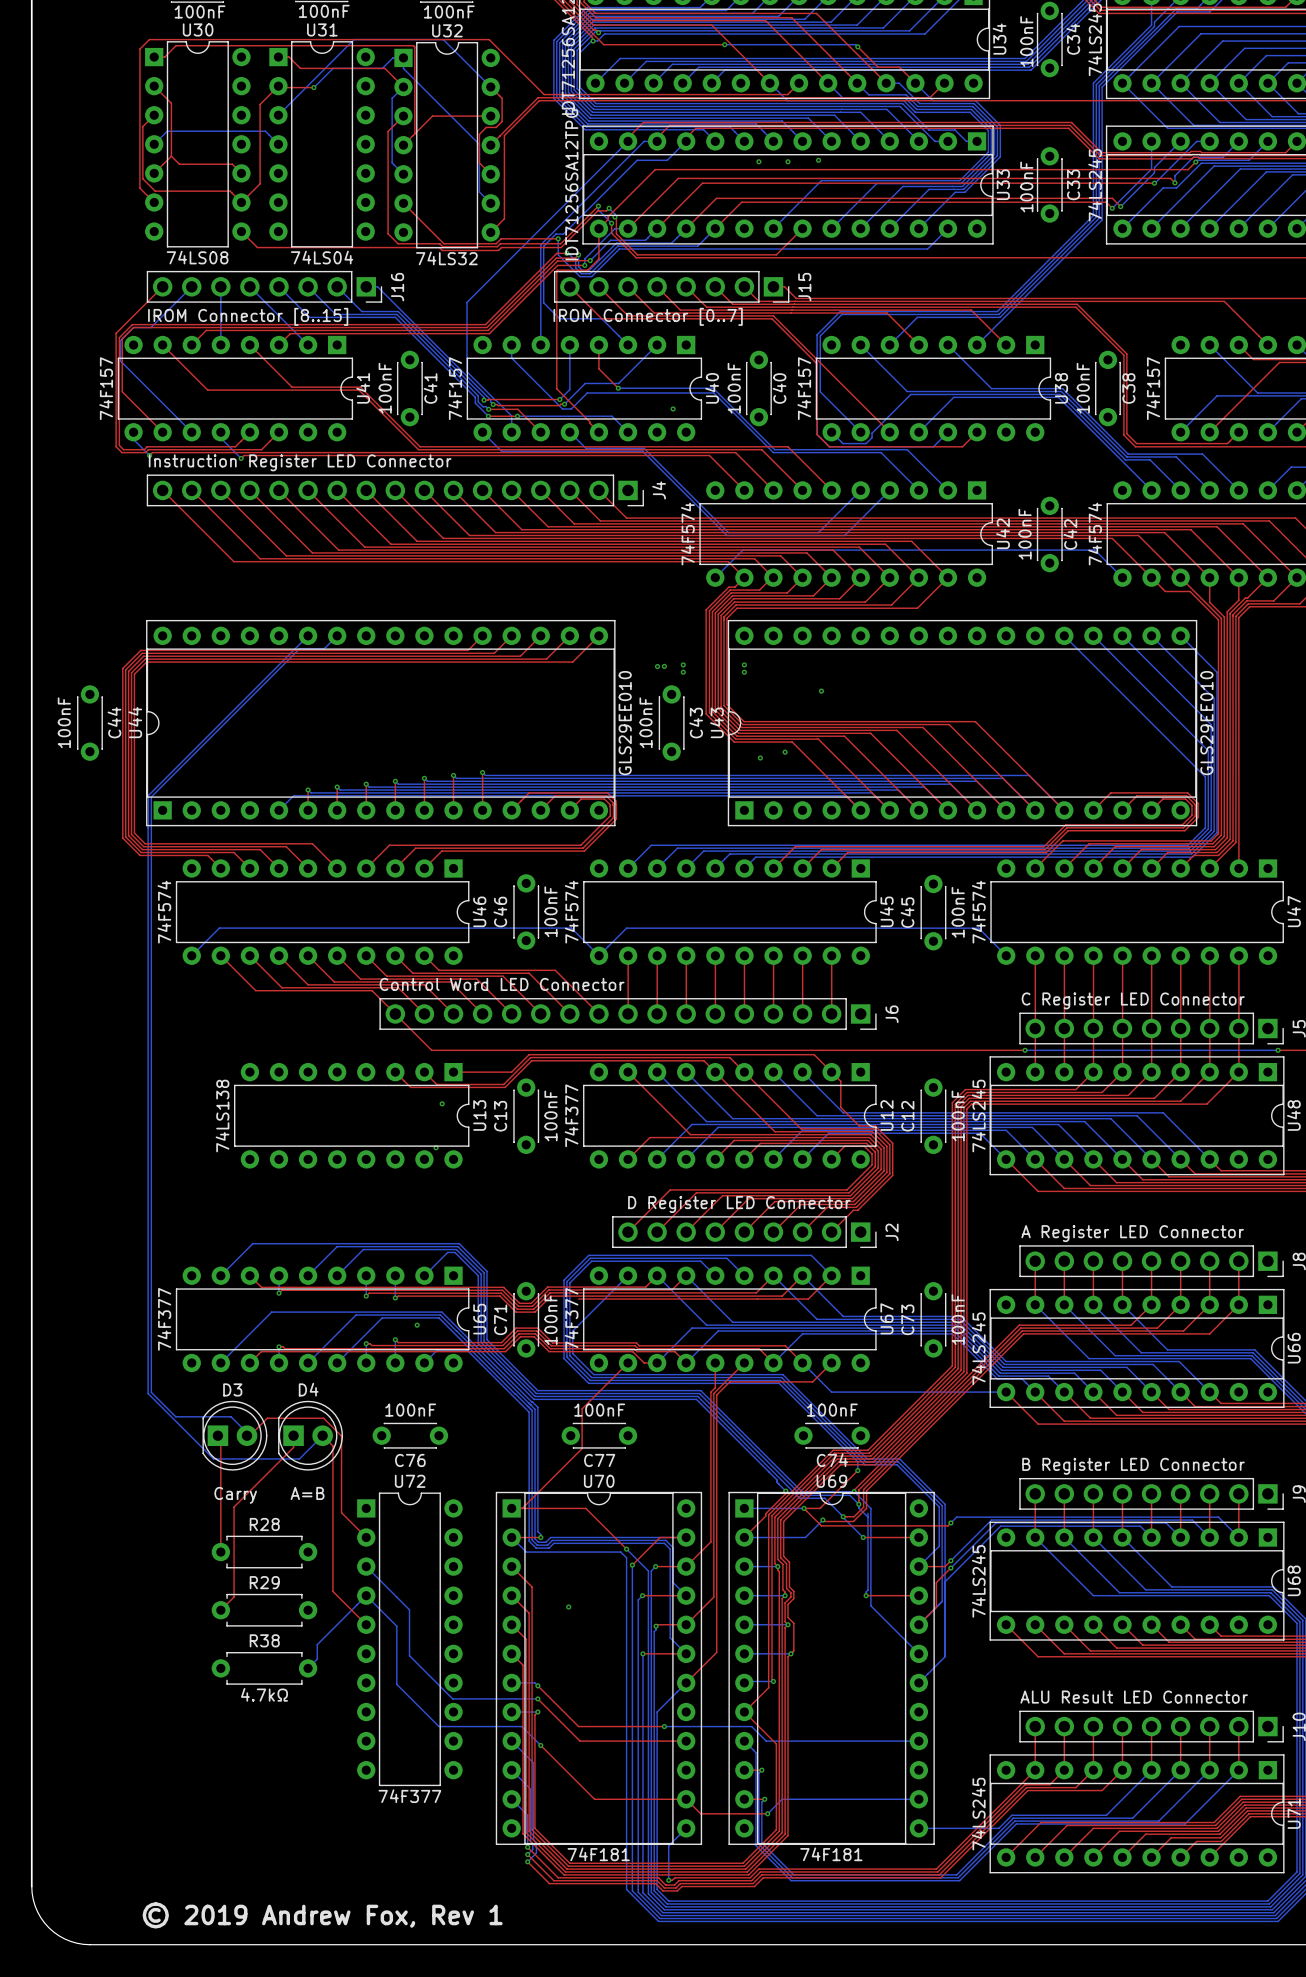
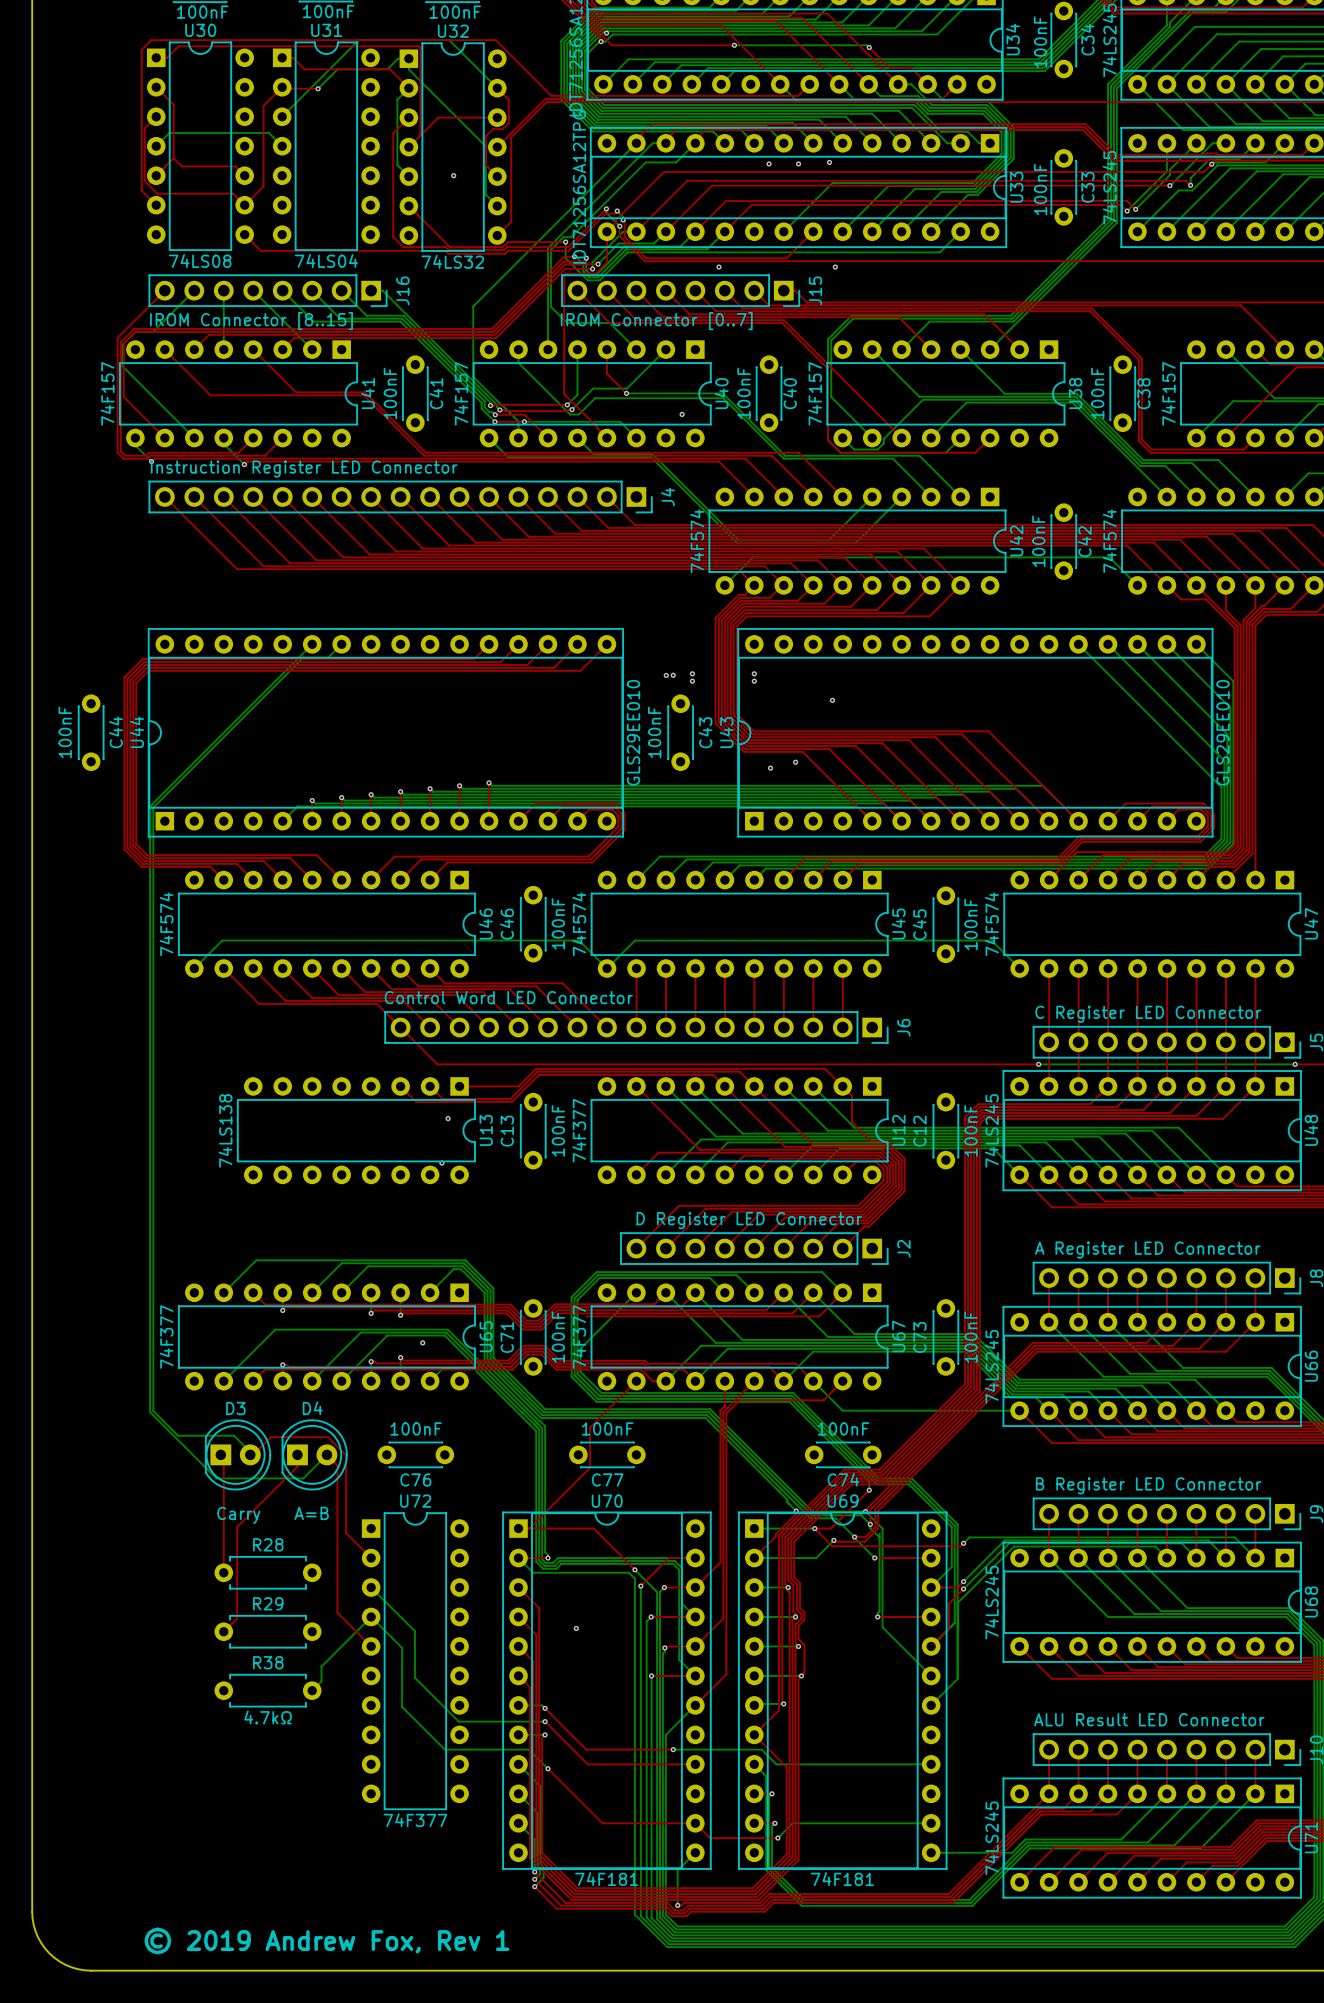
via: none -> (453, 175)
via: none -> (718, 267)
via: none -> (835, 267)

